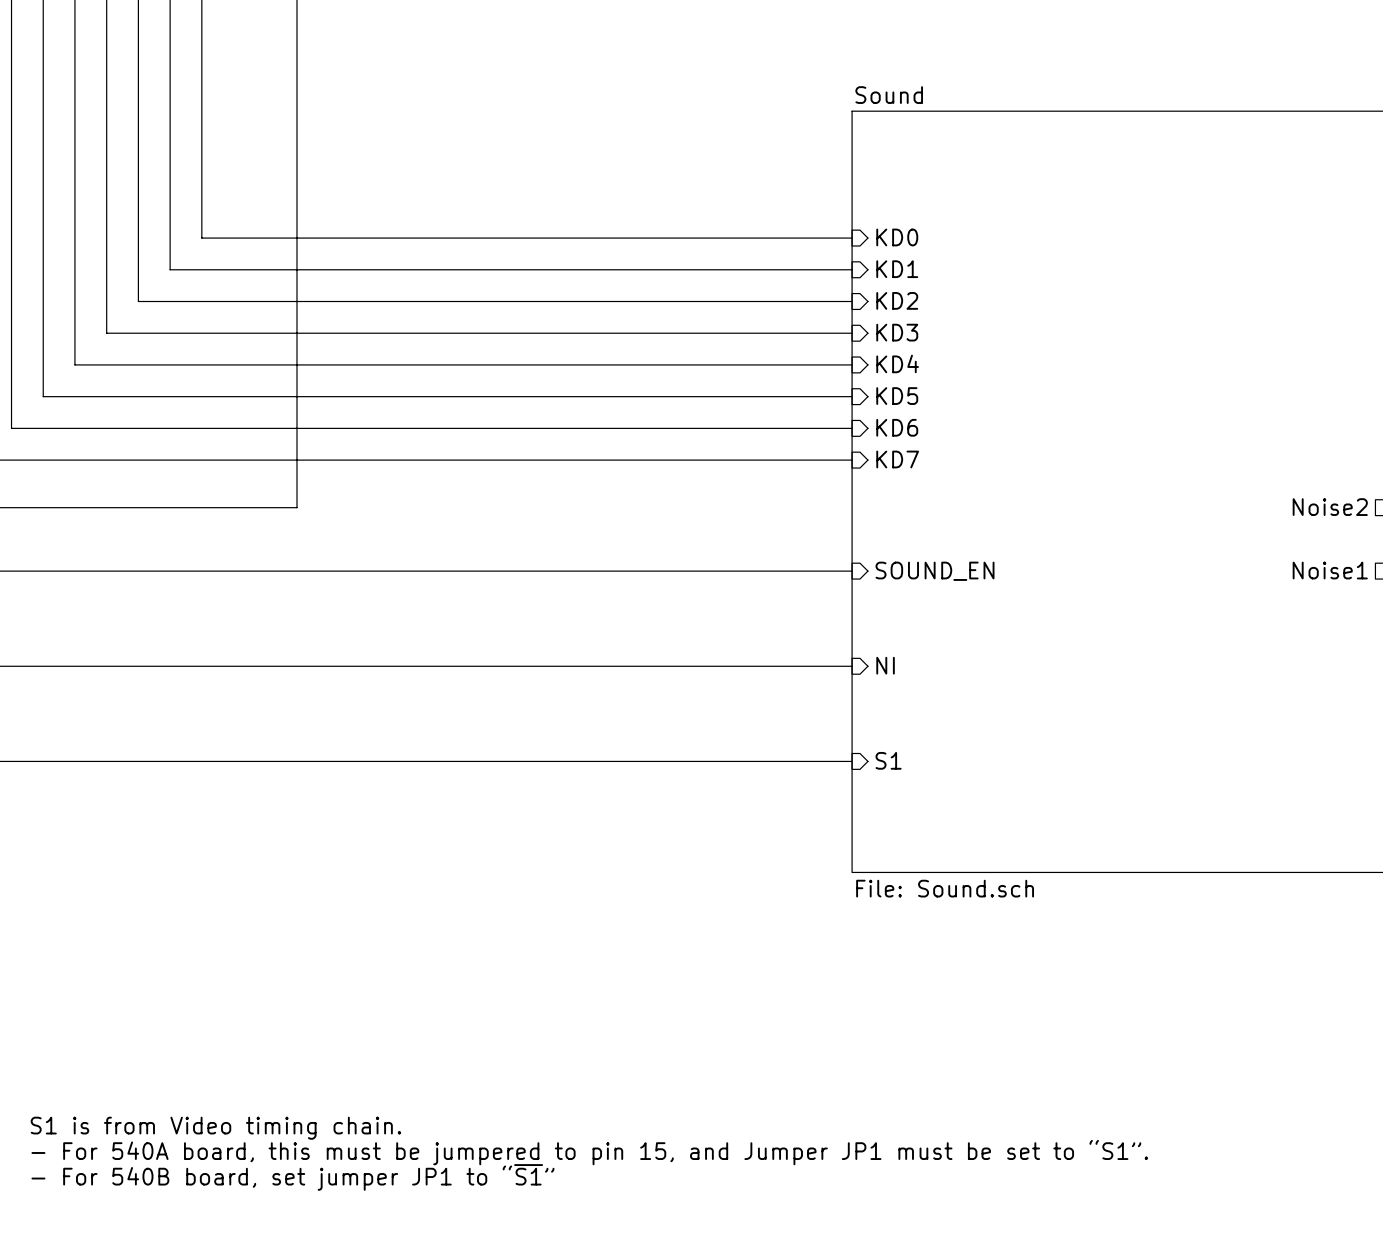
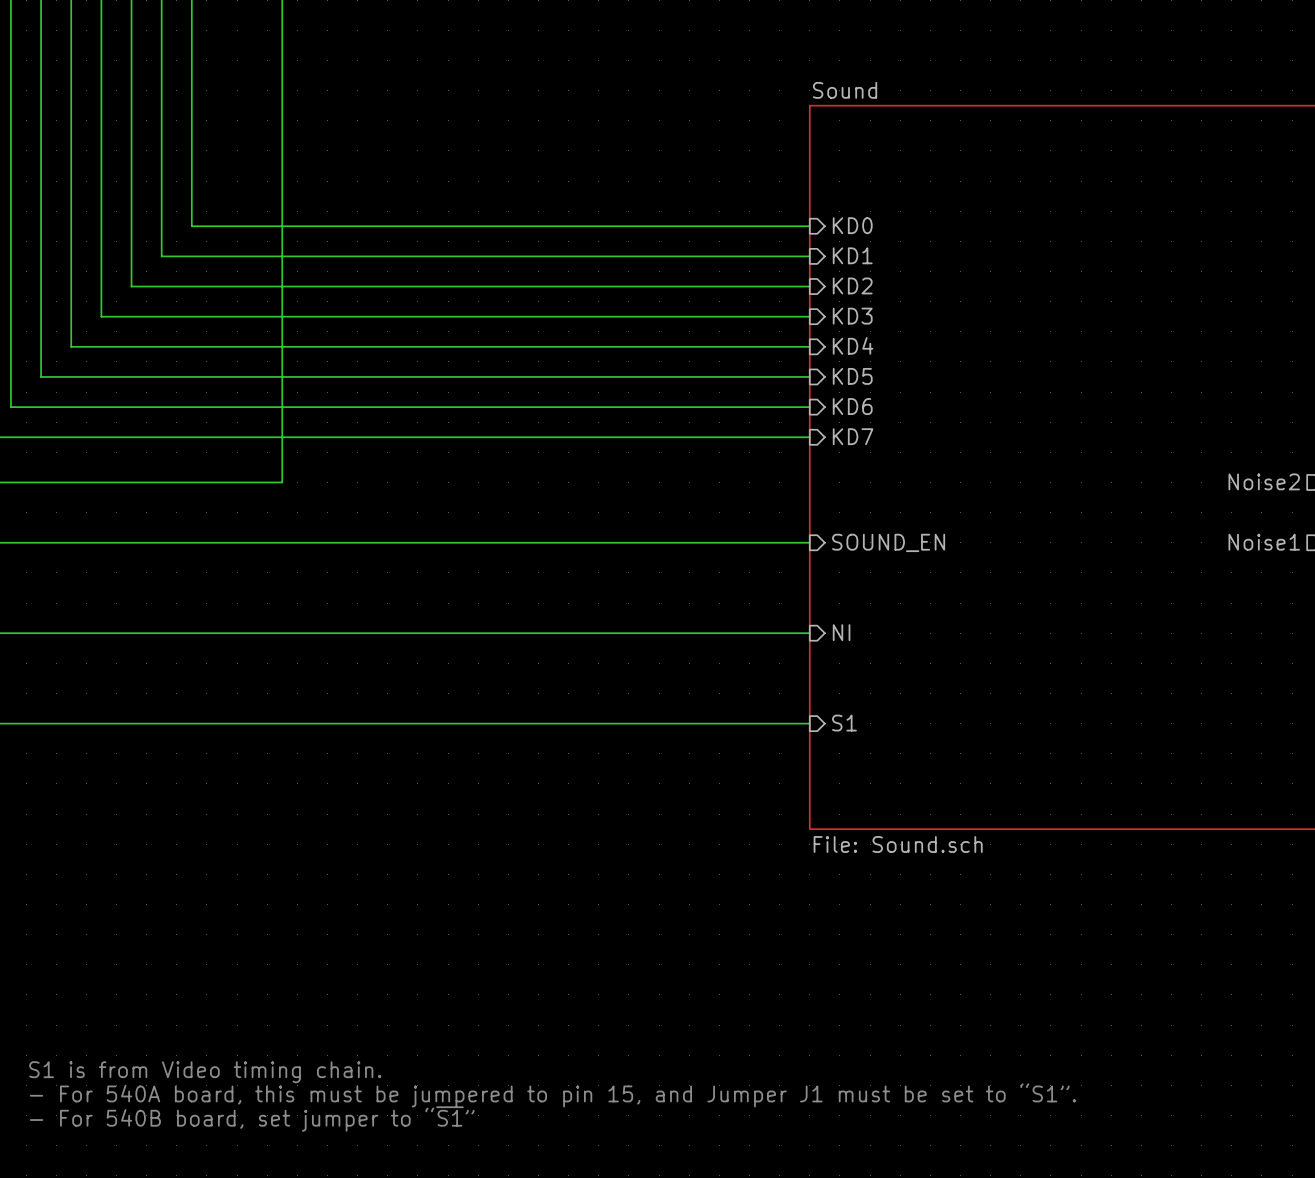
text: - For 540A board, this must be jumpered to pin 15, and Jumper JP1 must be set to “S1”. (589, 1152) -> - For 540A board, this must be jumpered to pin 15, and Jumper J1 must be set to “S1”. (552, 1095)
text: - For 540B board, set jumper JP1 to “~{S1}” (292, 1177) -> - For 540B board, set jumper to “~{S1}” (252, 1119)

